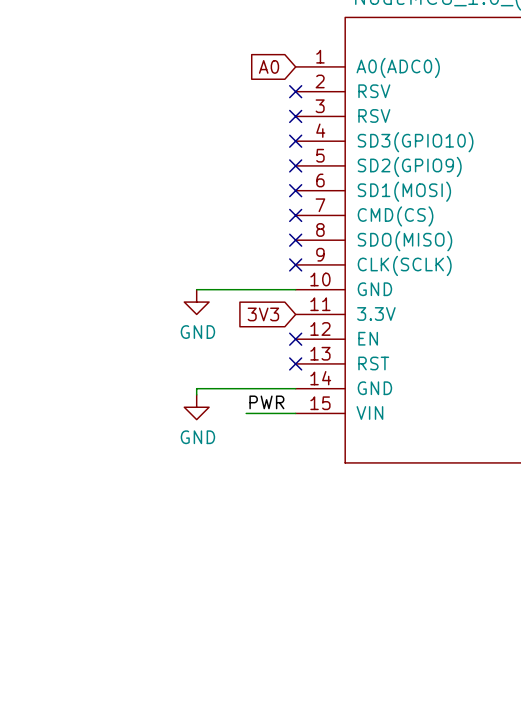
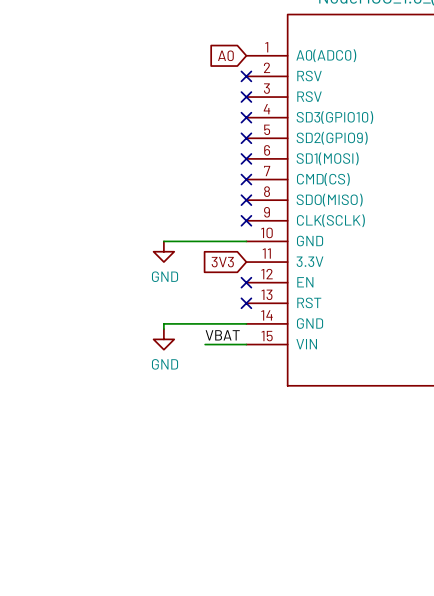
label: PWR (266, 402) -> VBAT (222, 335)

